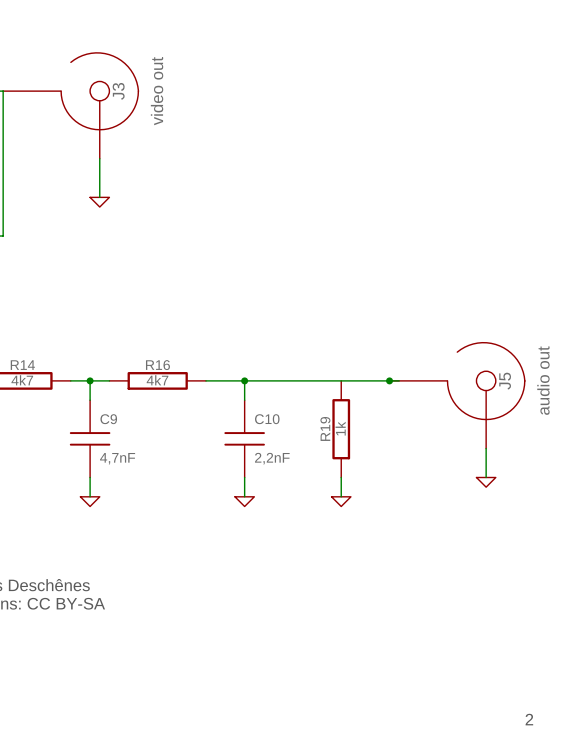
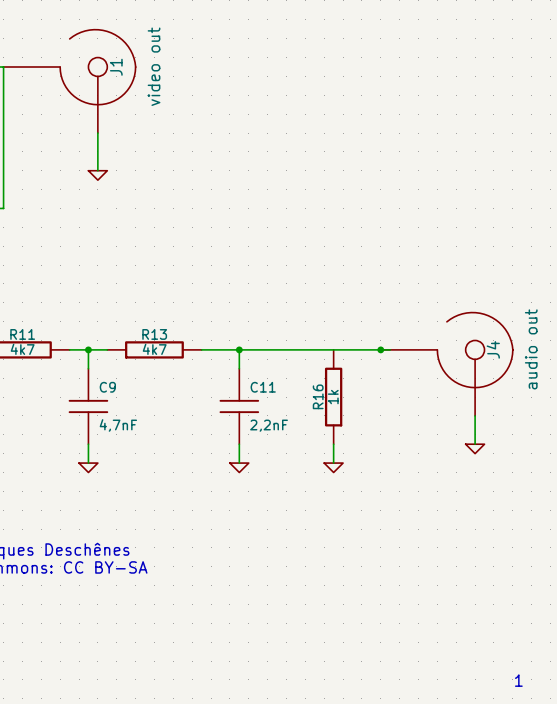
J3 name: J3 (118, 91) -> J1 (116, 67)
R14 name: R14 (22, 365) -> R11 (22, 334)
R16 name: R16 (157, 365) -> R13 (154, 334)
J5 name: J5 (505, 381) -> J4 (493, 349)
C10 name: C10 (267, 419) -> C11 (263, 387)
R19 name: R19 (325, 428) -> R16 (318, 396)
text: 2 (529, 719) -> 1 (518, 680)

